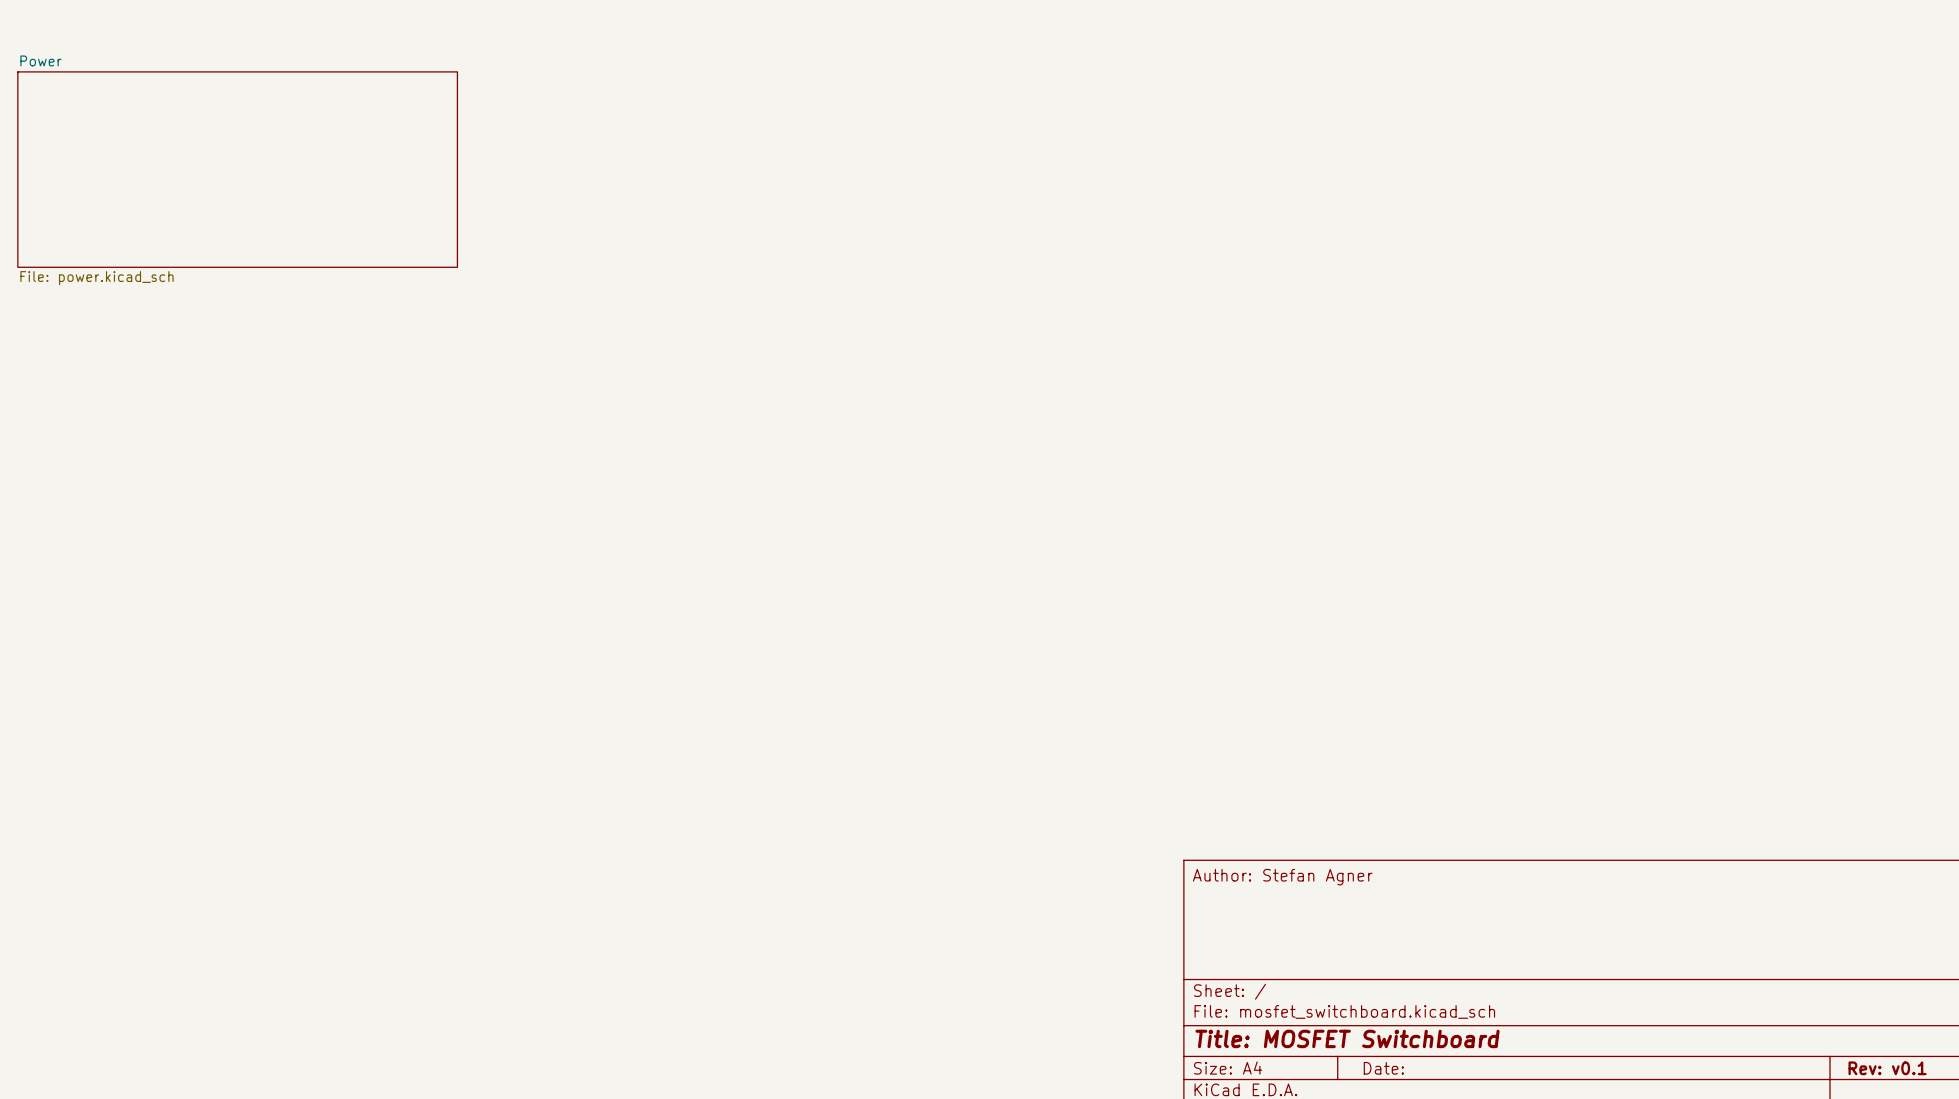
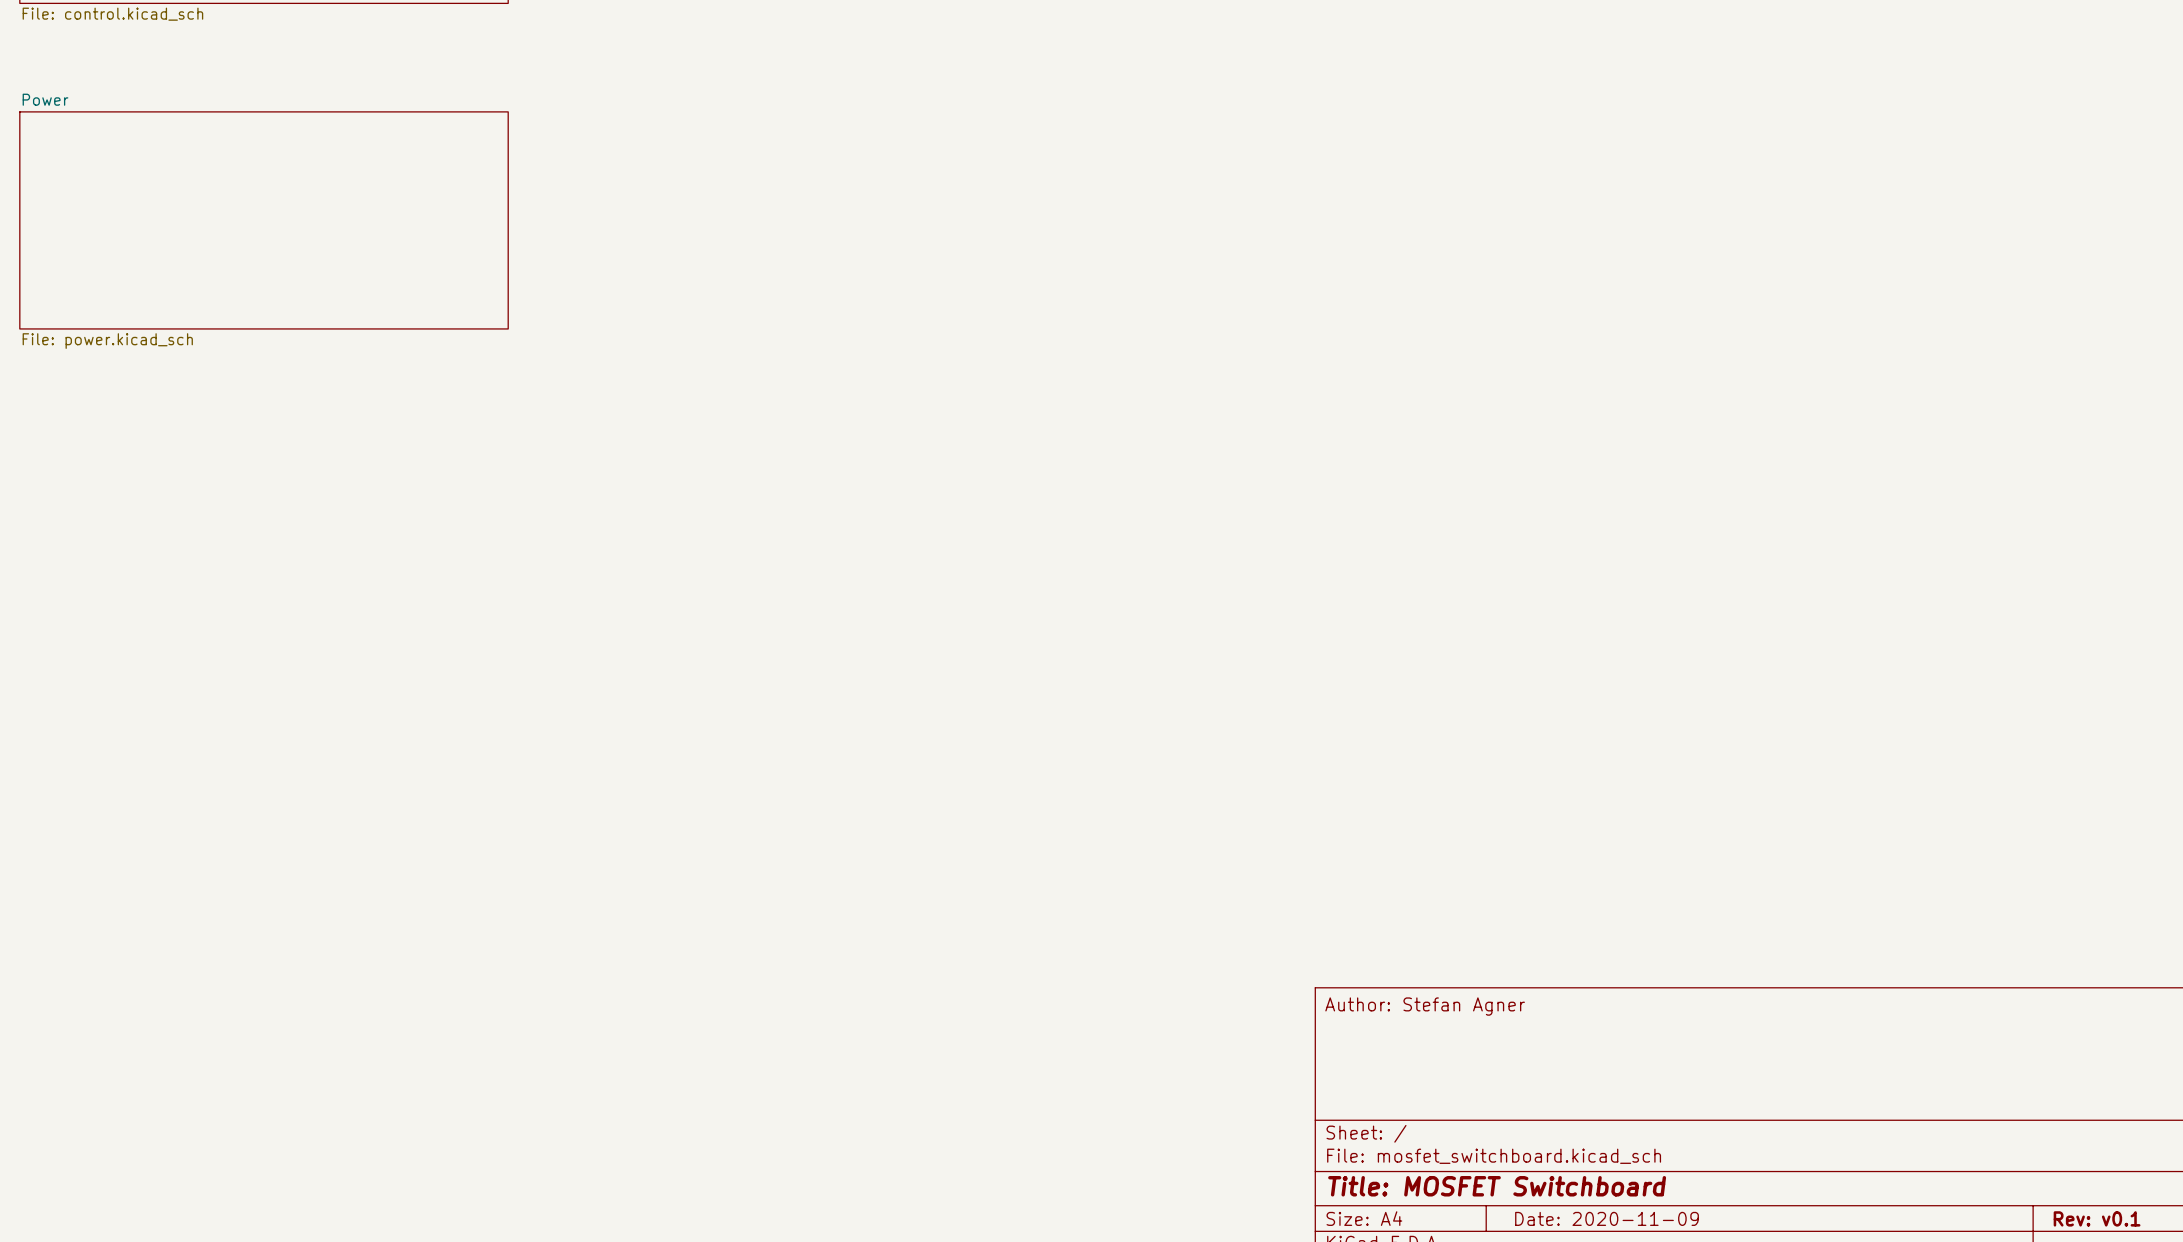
title block: Date: (1383, 1068) -> Date: 2020-11-09 (1607, 1218)

